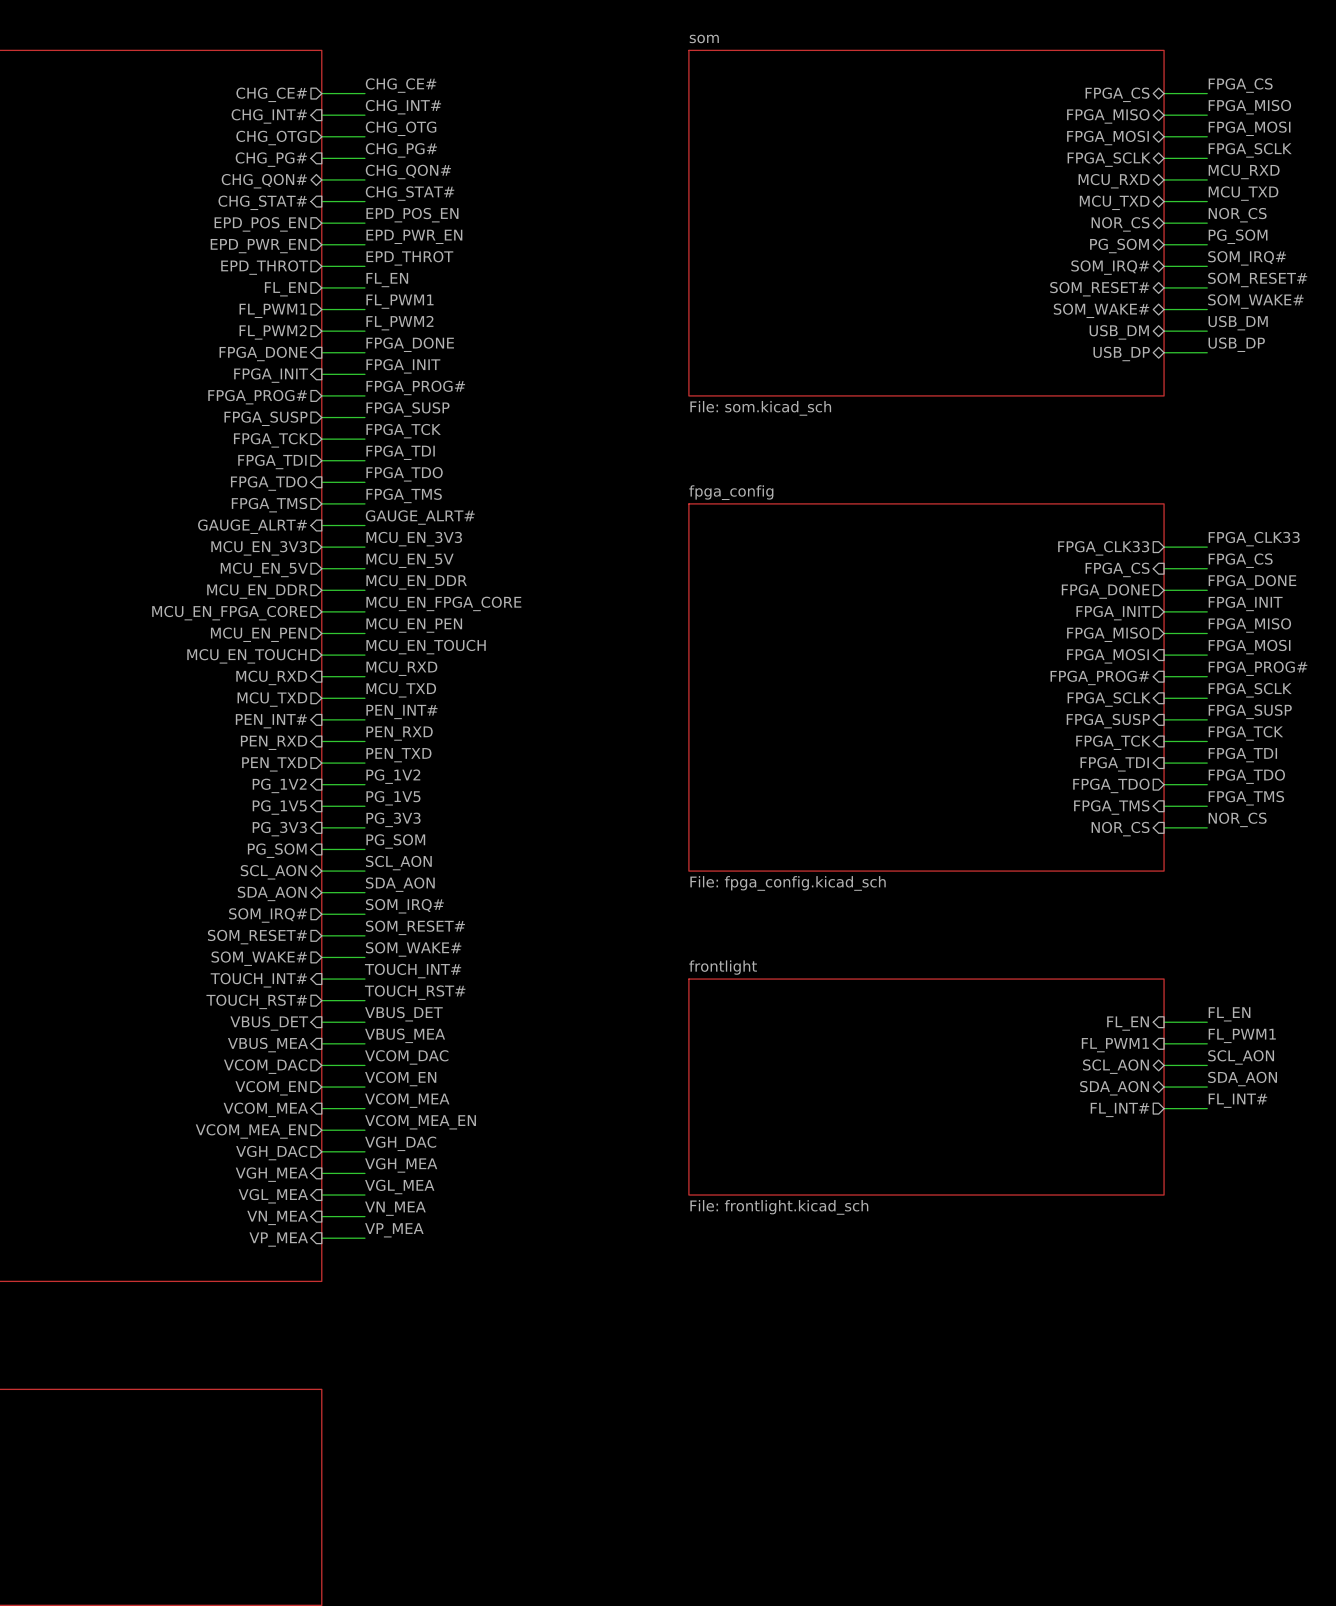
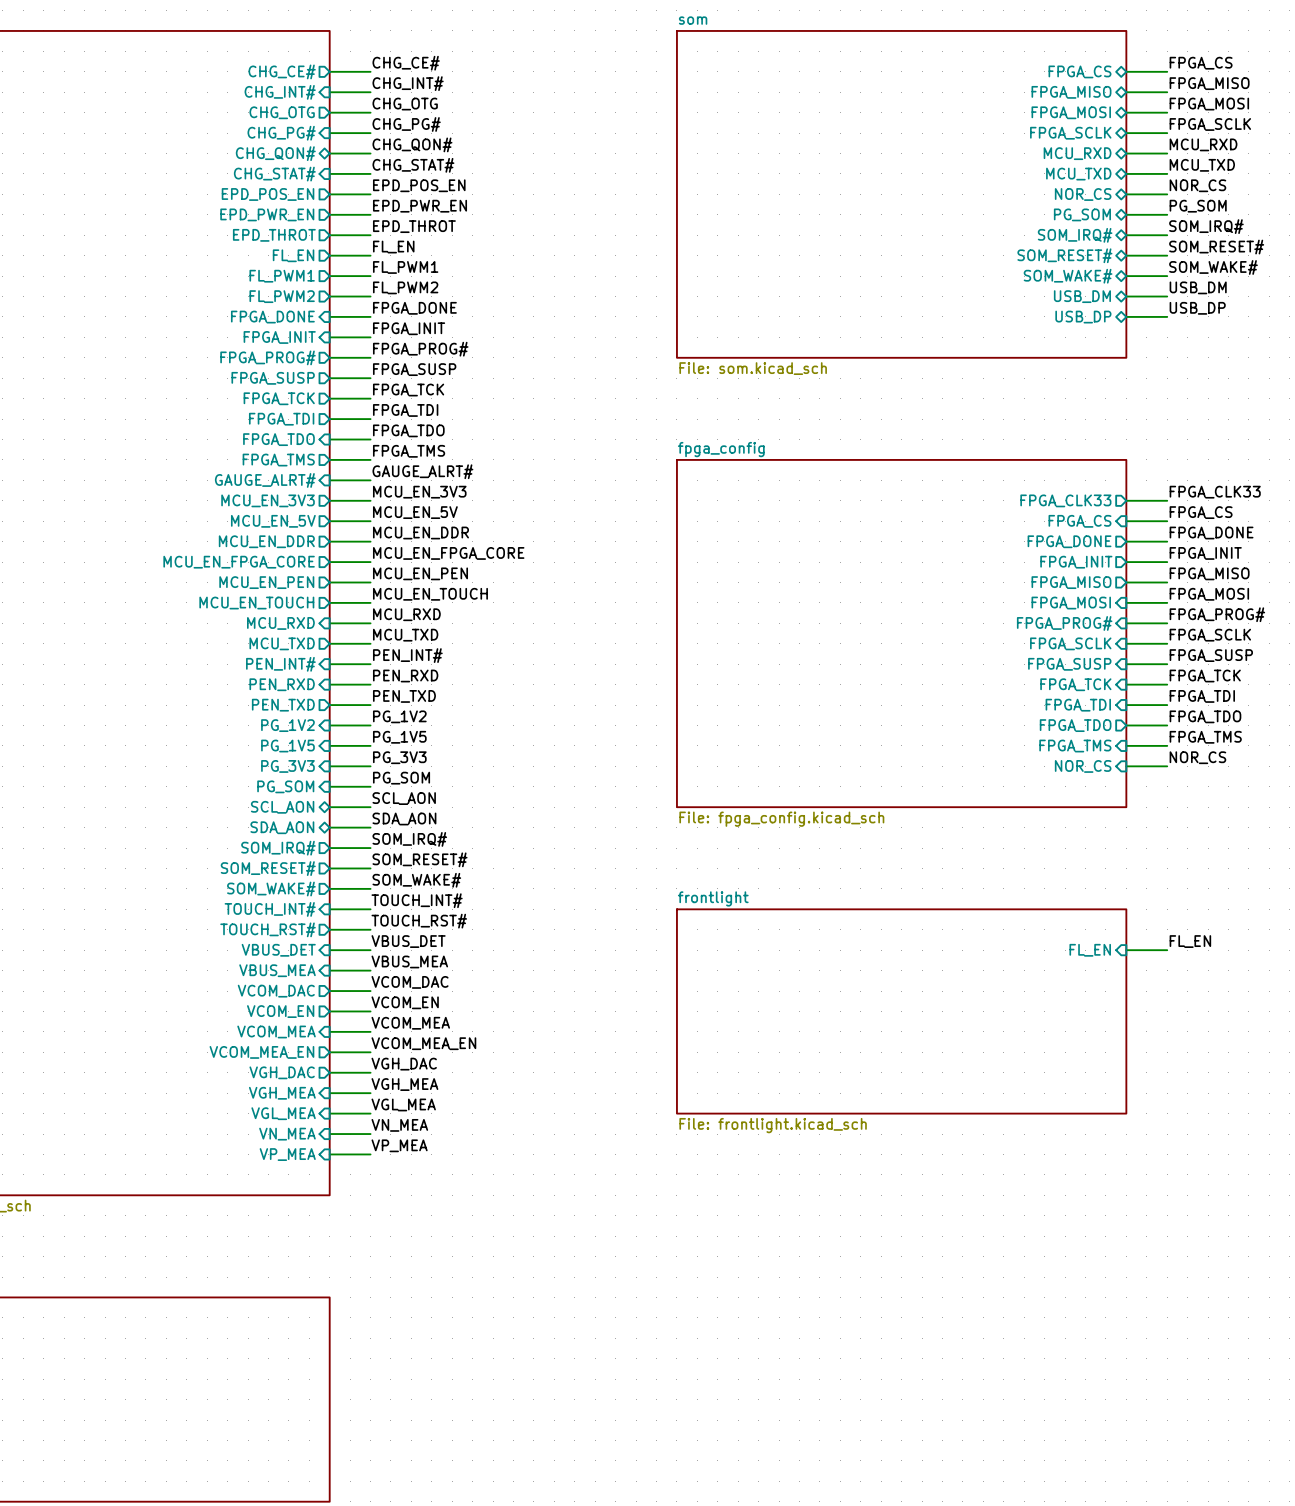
label: FL_PWM1 (1242, 1035) -> none
wire: (1164, 1043) (1207, 1043) -> none
sheet pin: FL_PWM1 (1115, 1045) -> none
label: SCL_AON (1241, 1057) -> none
wire: (1164, 1065) (1207, 1065) -> none
sheet pin: SCL_AON (1115, 1066) -> none
label: SDA_AON (1242, 1079) -> none
wire: (1164, 1087) (1207, 1087) -> none
sheet pin: SDA_AON (1114, 1088) -> none
label: FL_INT# (1237, 1100) -> none
wire: (1164, 1108) (1207, 1108) -> none
sheet pin: FL_INT# (1119, 1109) -> none

